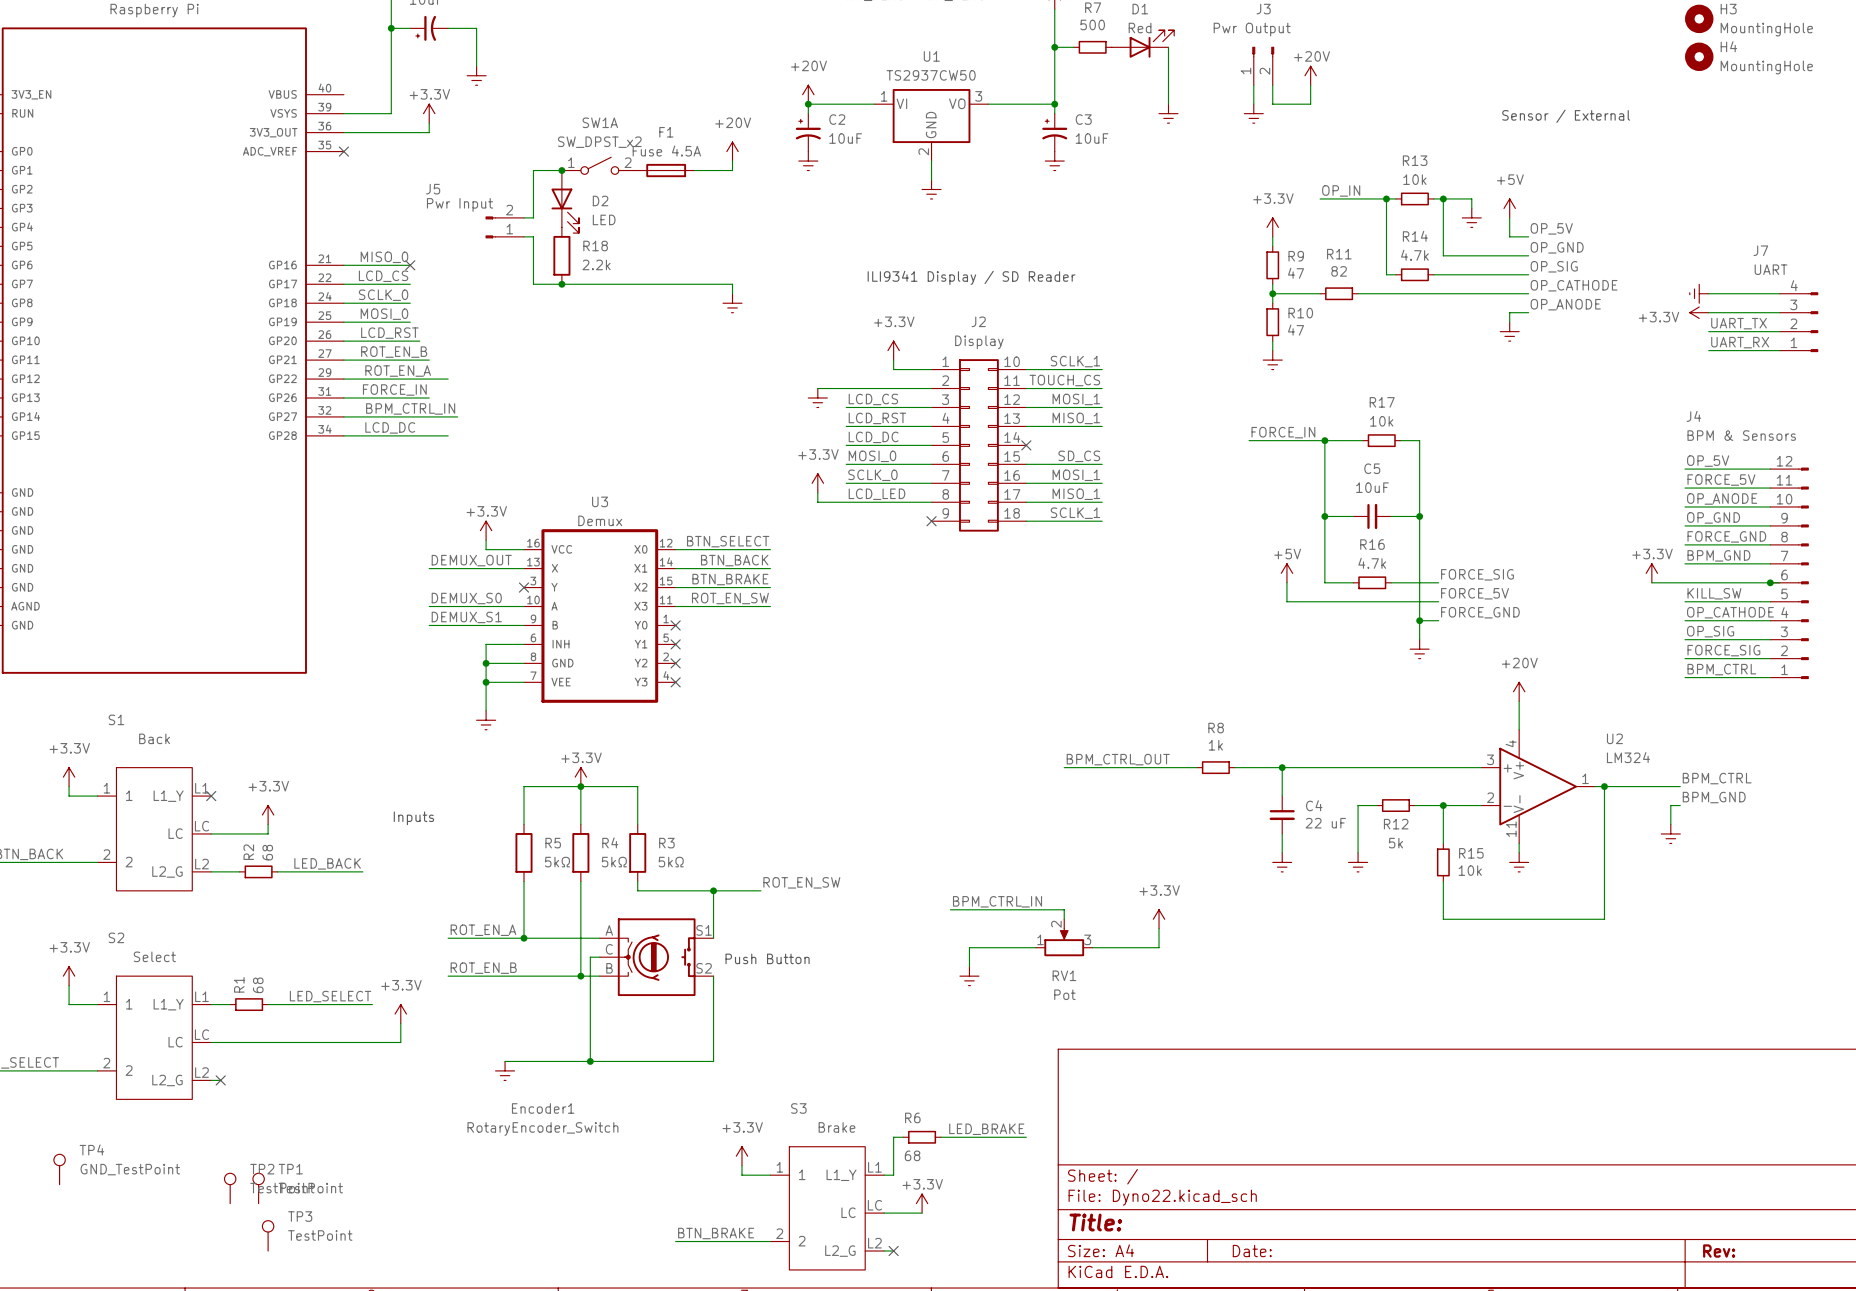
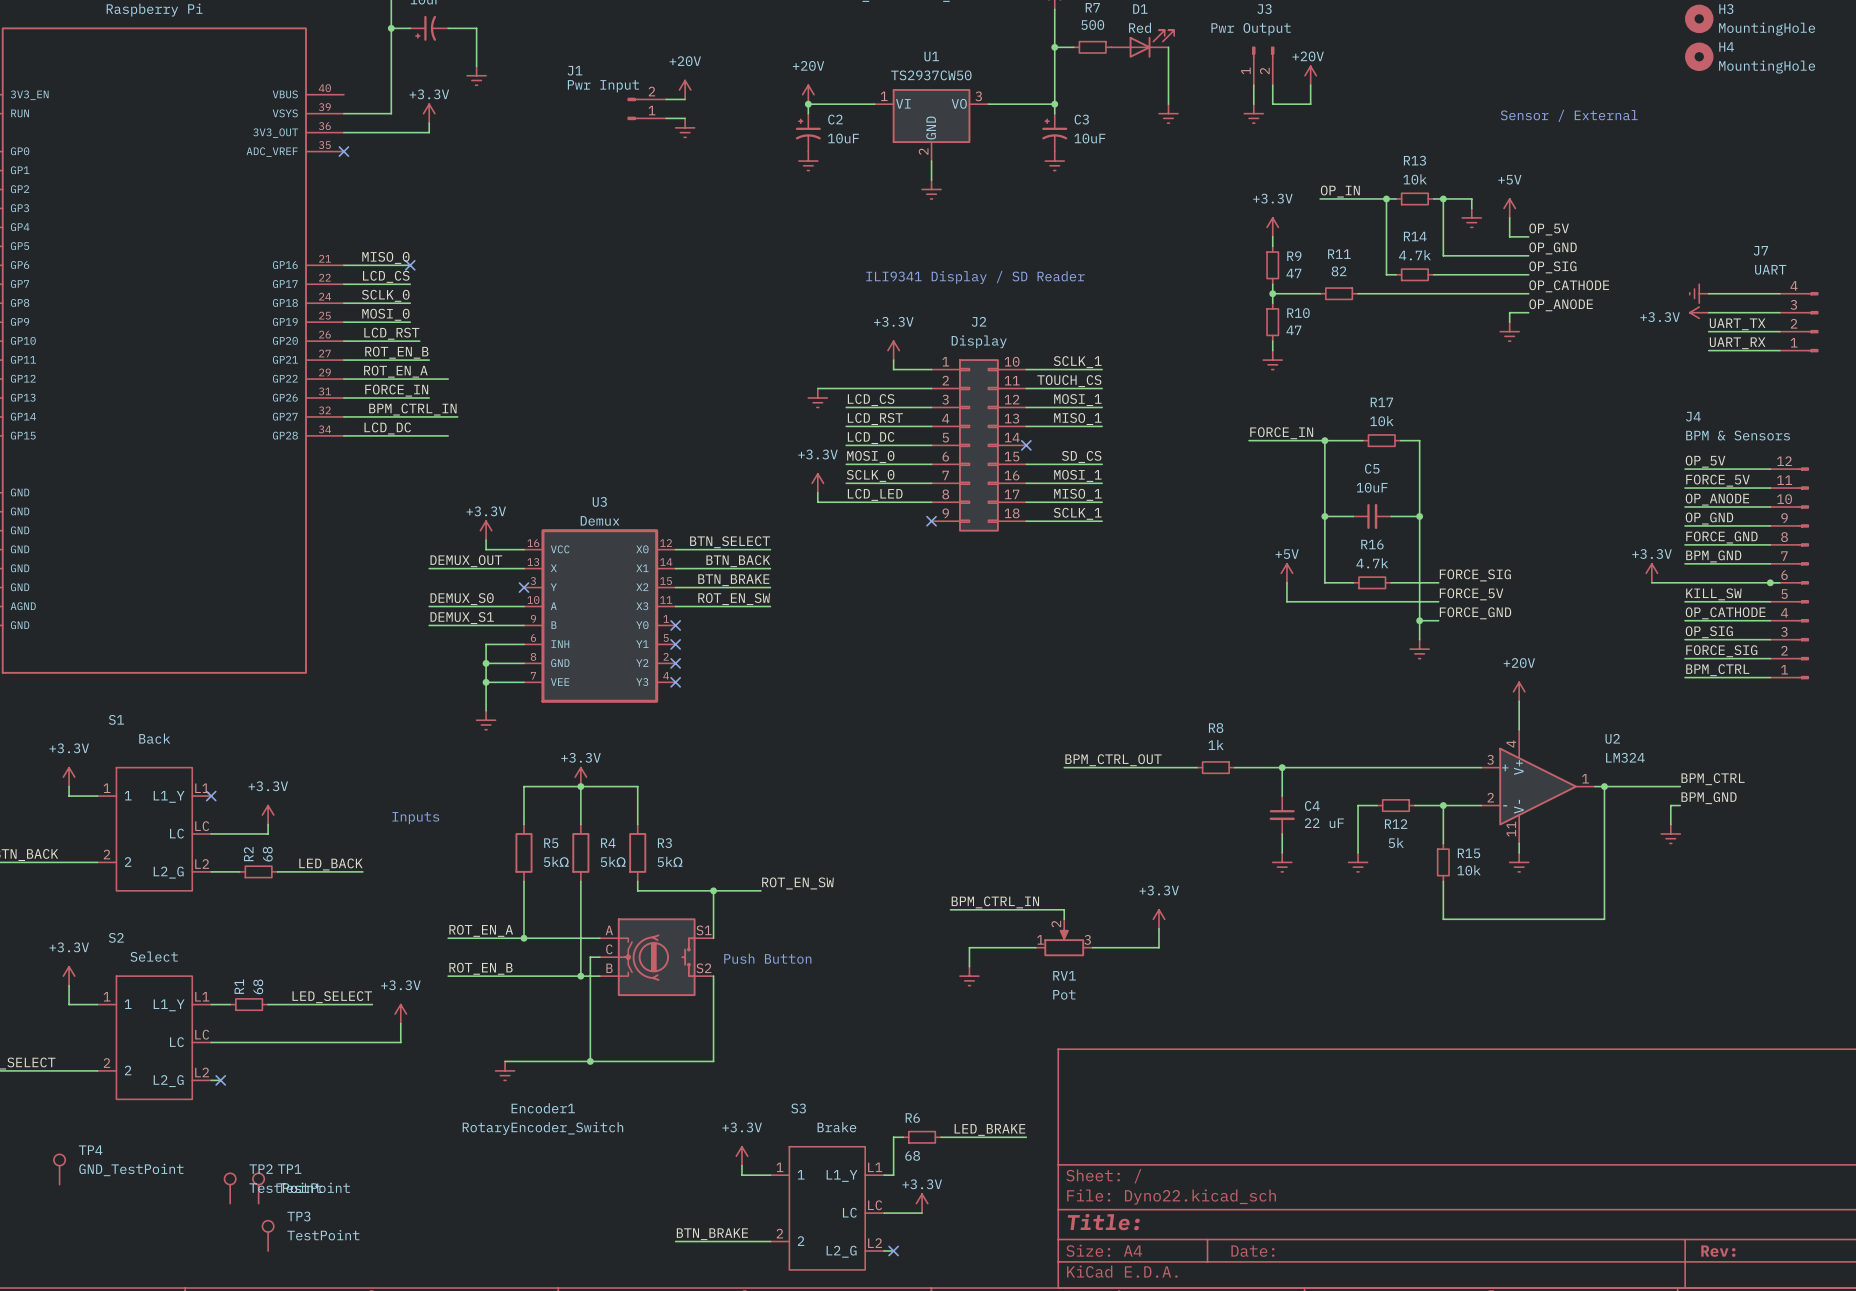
wire: none -> (666, 99) (685, 99)
J1: none -> Pwr Input (646, 108)
wire: none -> (666, 118) (685, 118)
power symbol position: +20V (732, 151) -> +20V (685, 89)
wire: (732, 161) (732, 170) (694, 170) -> none
SW1A: SW_DPST_x2 (599, 165) -> none
wire: (561, 170) (533, 170) (533, 217) (523, 217) -> none
junction: (561, 170) -> none
F1: Fuse 4.5A (666, 170) -> none
D2: LED (565, 201) -> none
J5: Pwr Input (504, 227) -> none
wire: (523, 236) (533, 236) (533, 284) (732, 284) (732, 293) -> none
R18: 2.2k (561, 255) -> none
junction: (561, 284) -> none
power symbol position: (732, 303) -> (685, 127)

